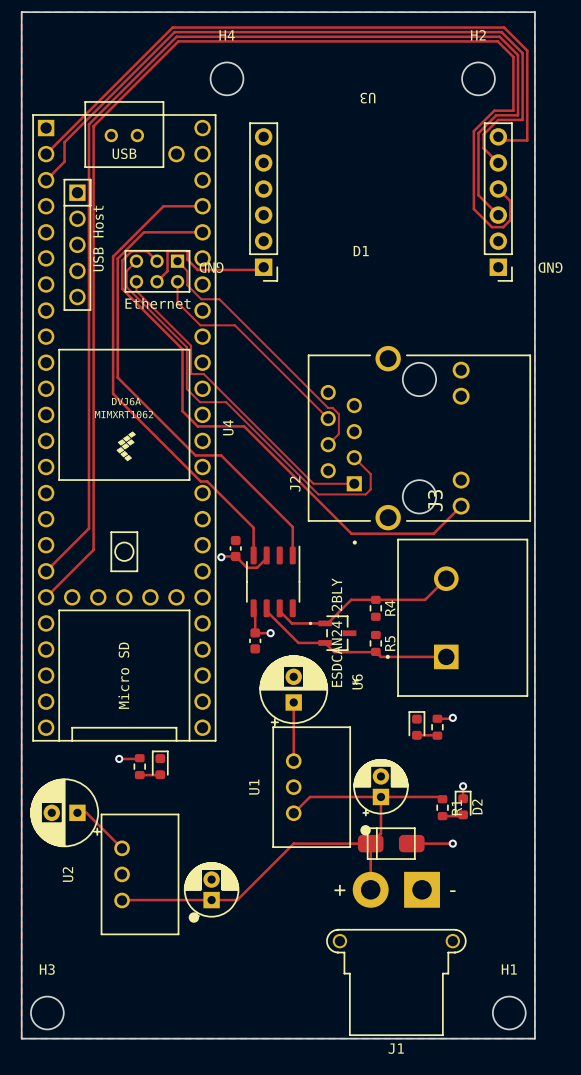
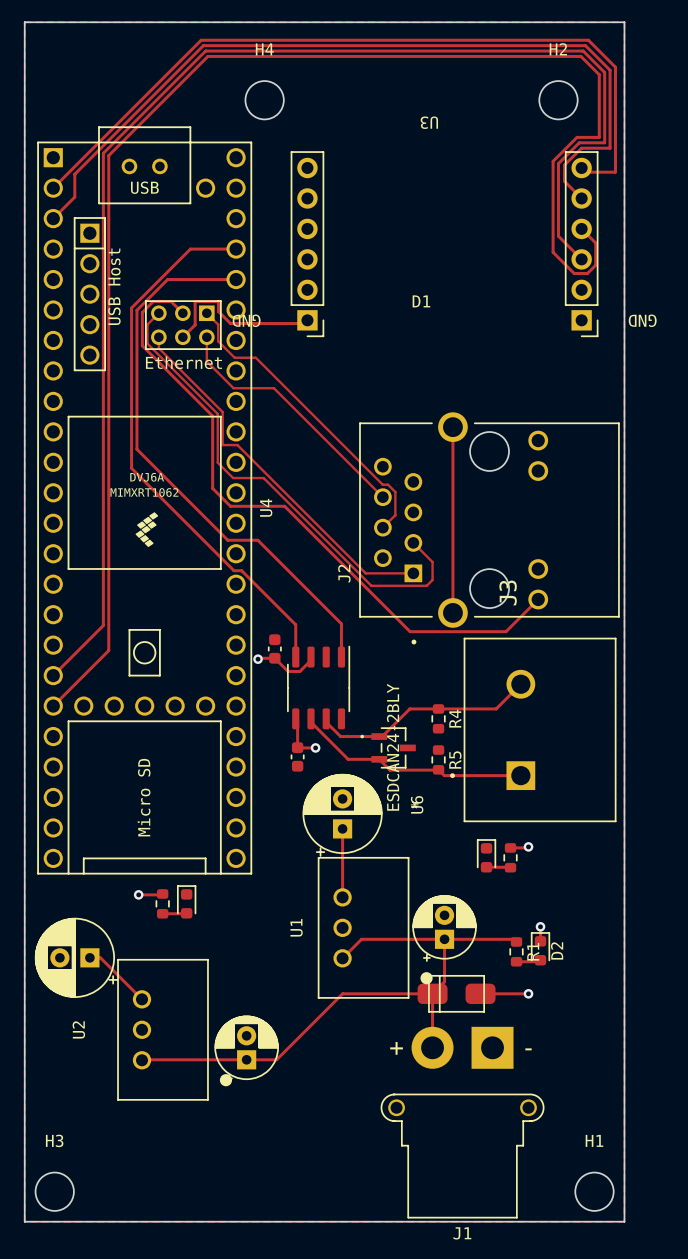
track: none -> (452, 427) (452, 612)

